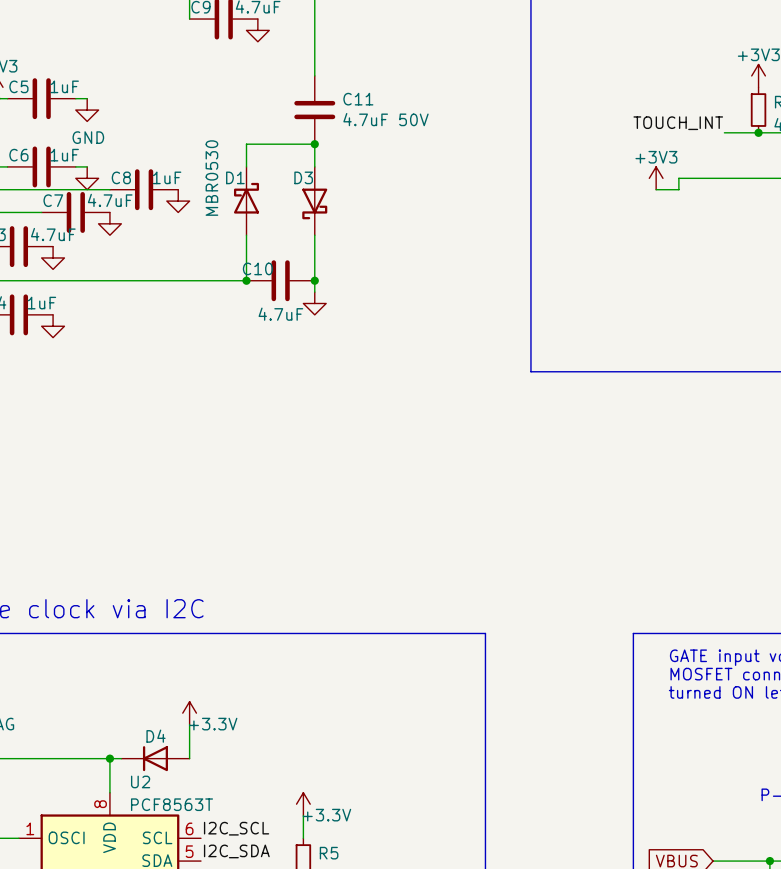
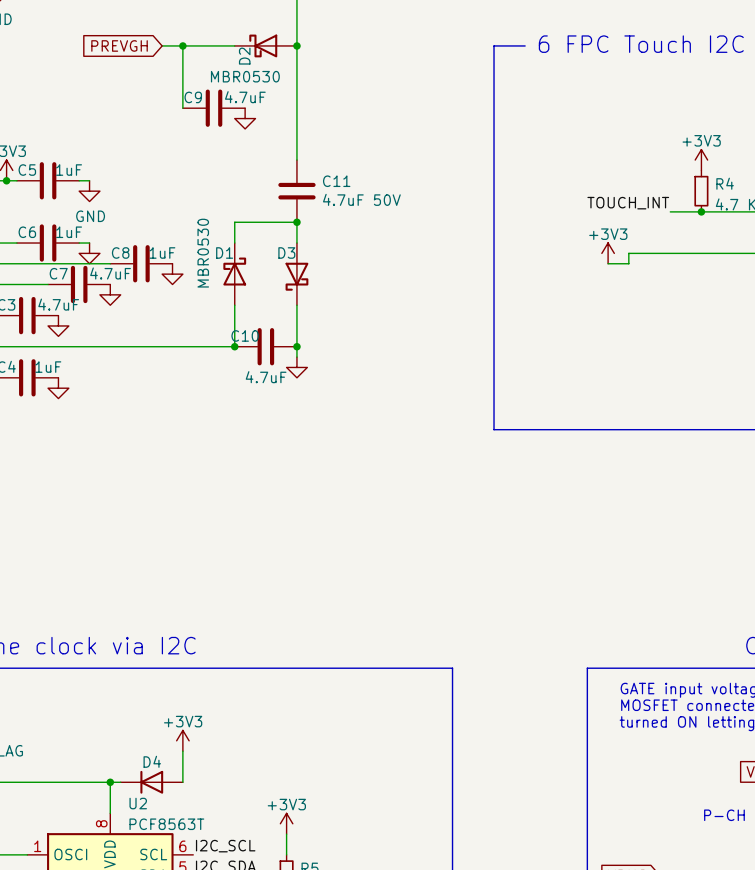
power symbol: +3.3V (189, 713) -> +3V3 (182, 740)
power symbol: +3.3V (303, 804) -> +3V3 (286, 823)

